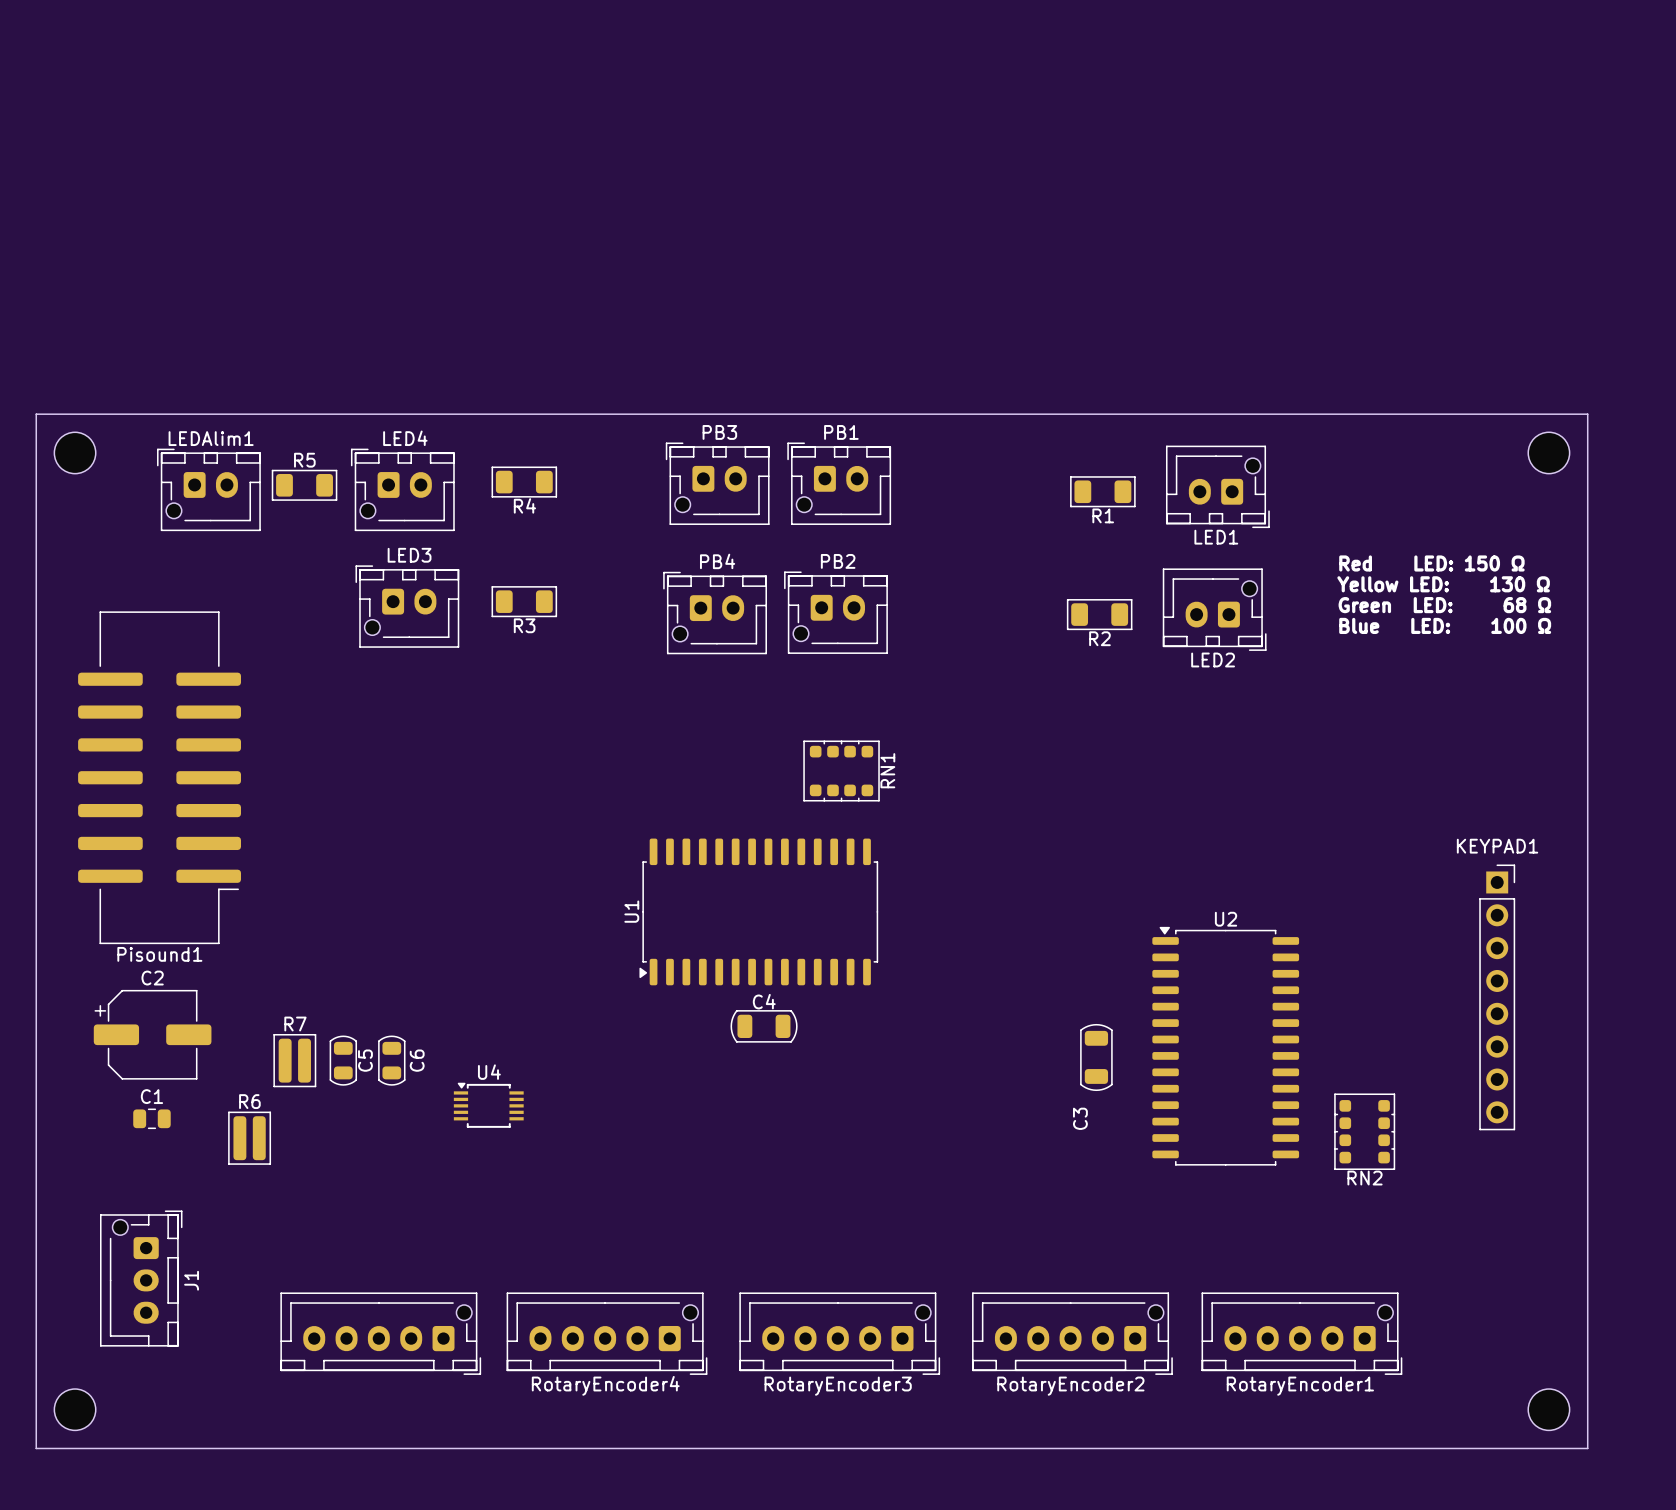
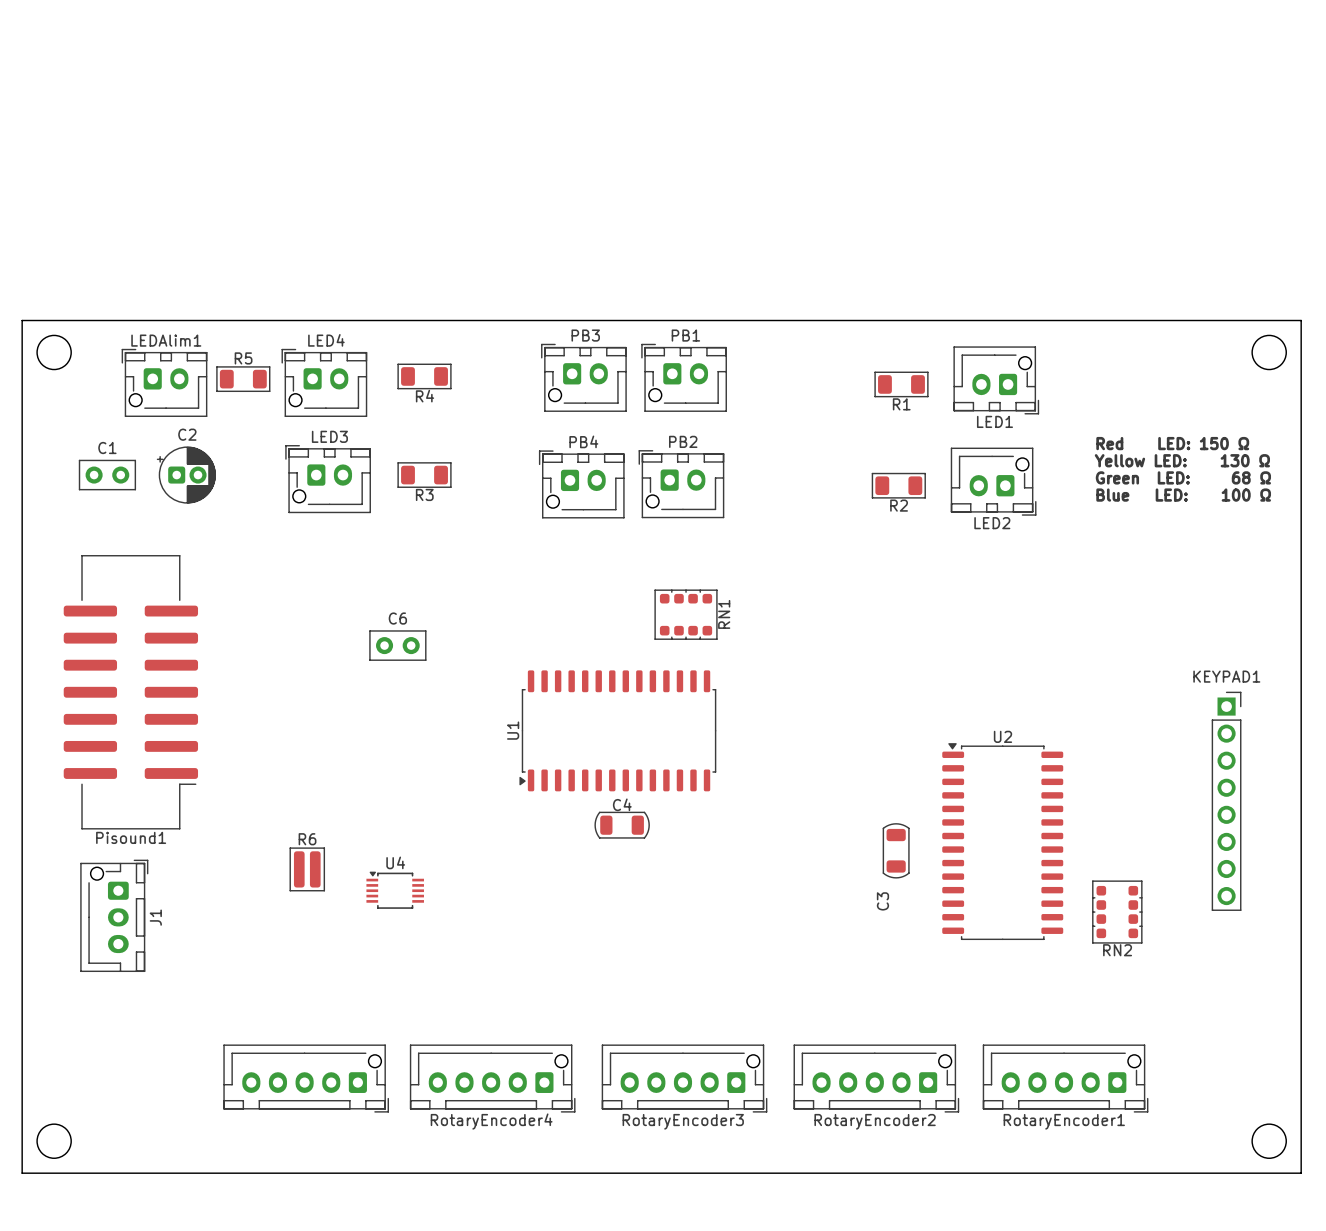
Pisound1 position: (159, 777) -> (130, 692)
C2 footprint: [93, 989, 212, 1080] -> [156, 446, 216, 504]
C6 footprint: [378, 1035, 406, 1086] -> [369, 630, 427, 661]
R7: (294, 1060) -> none
C5: (343, 1060) -> none
C6 name position: C6 (417, 1060) -> C6 (397, 618)
C1 footprint: [133, 1108, 171, 1130] -> [78, 459, 136, 491]
R6 position: (249, 1138) -> (307, 869)
J1 position: (141, 1278) -> (114, 915)

